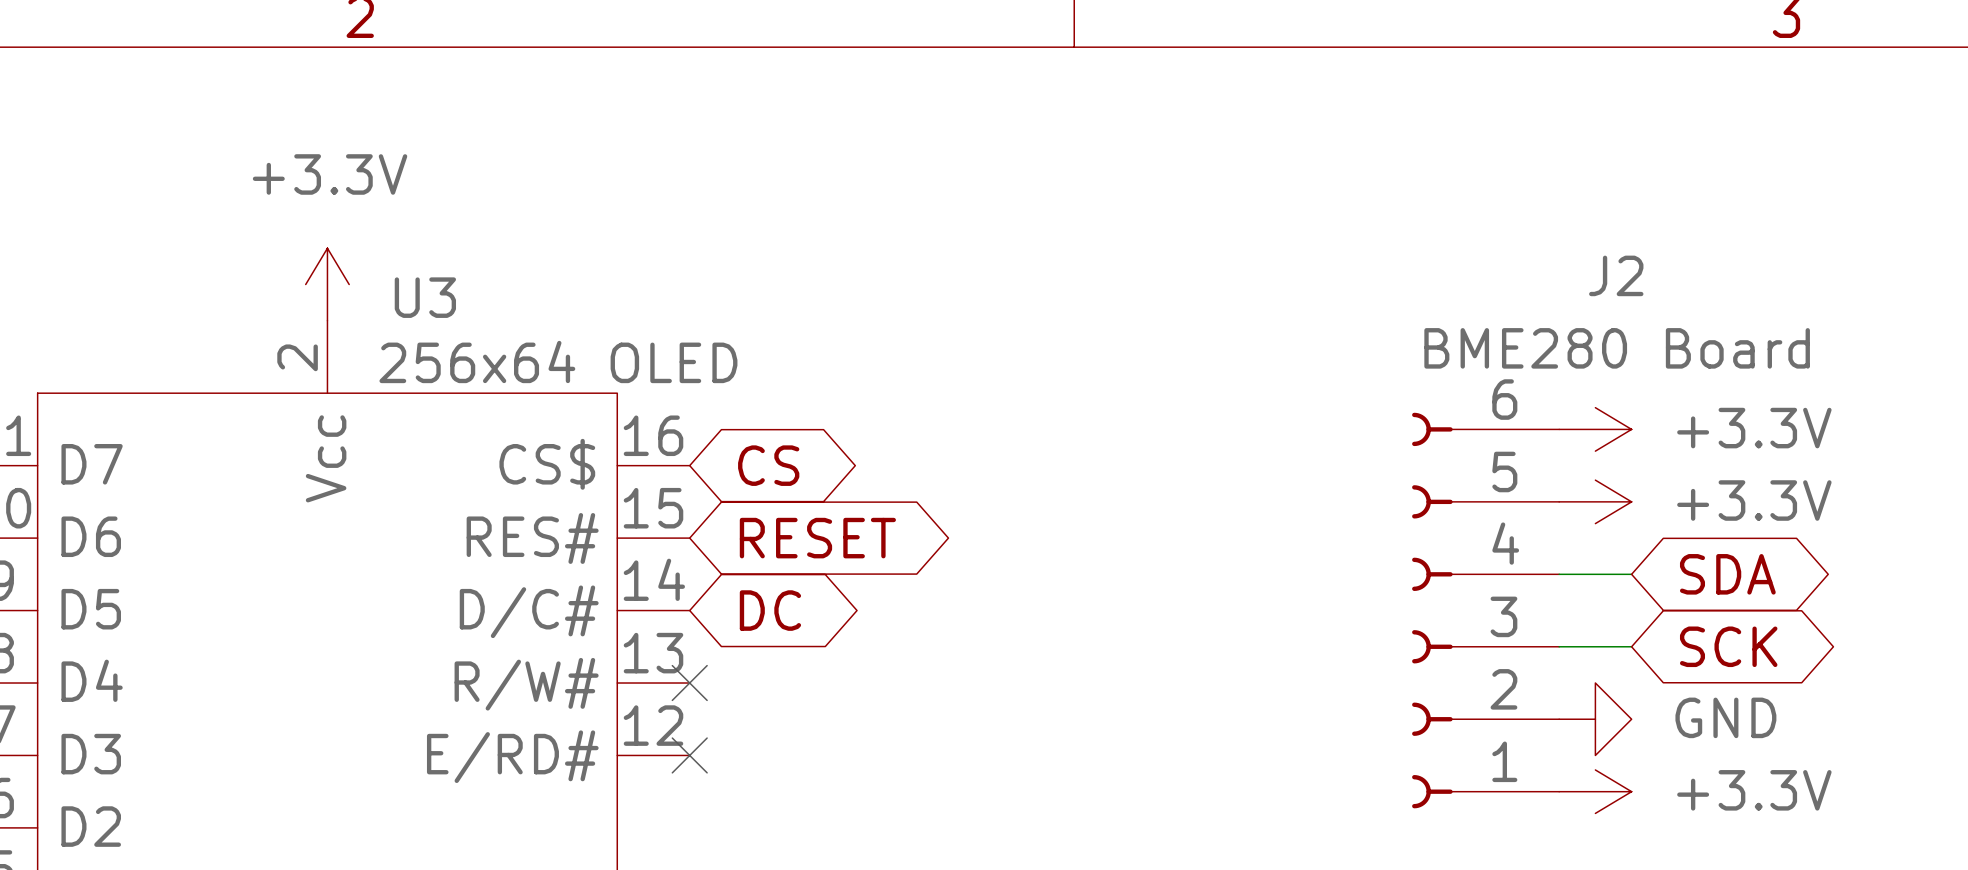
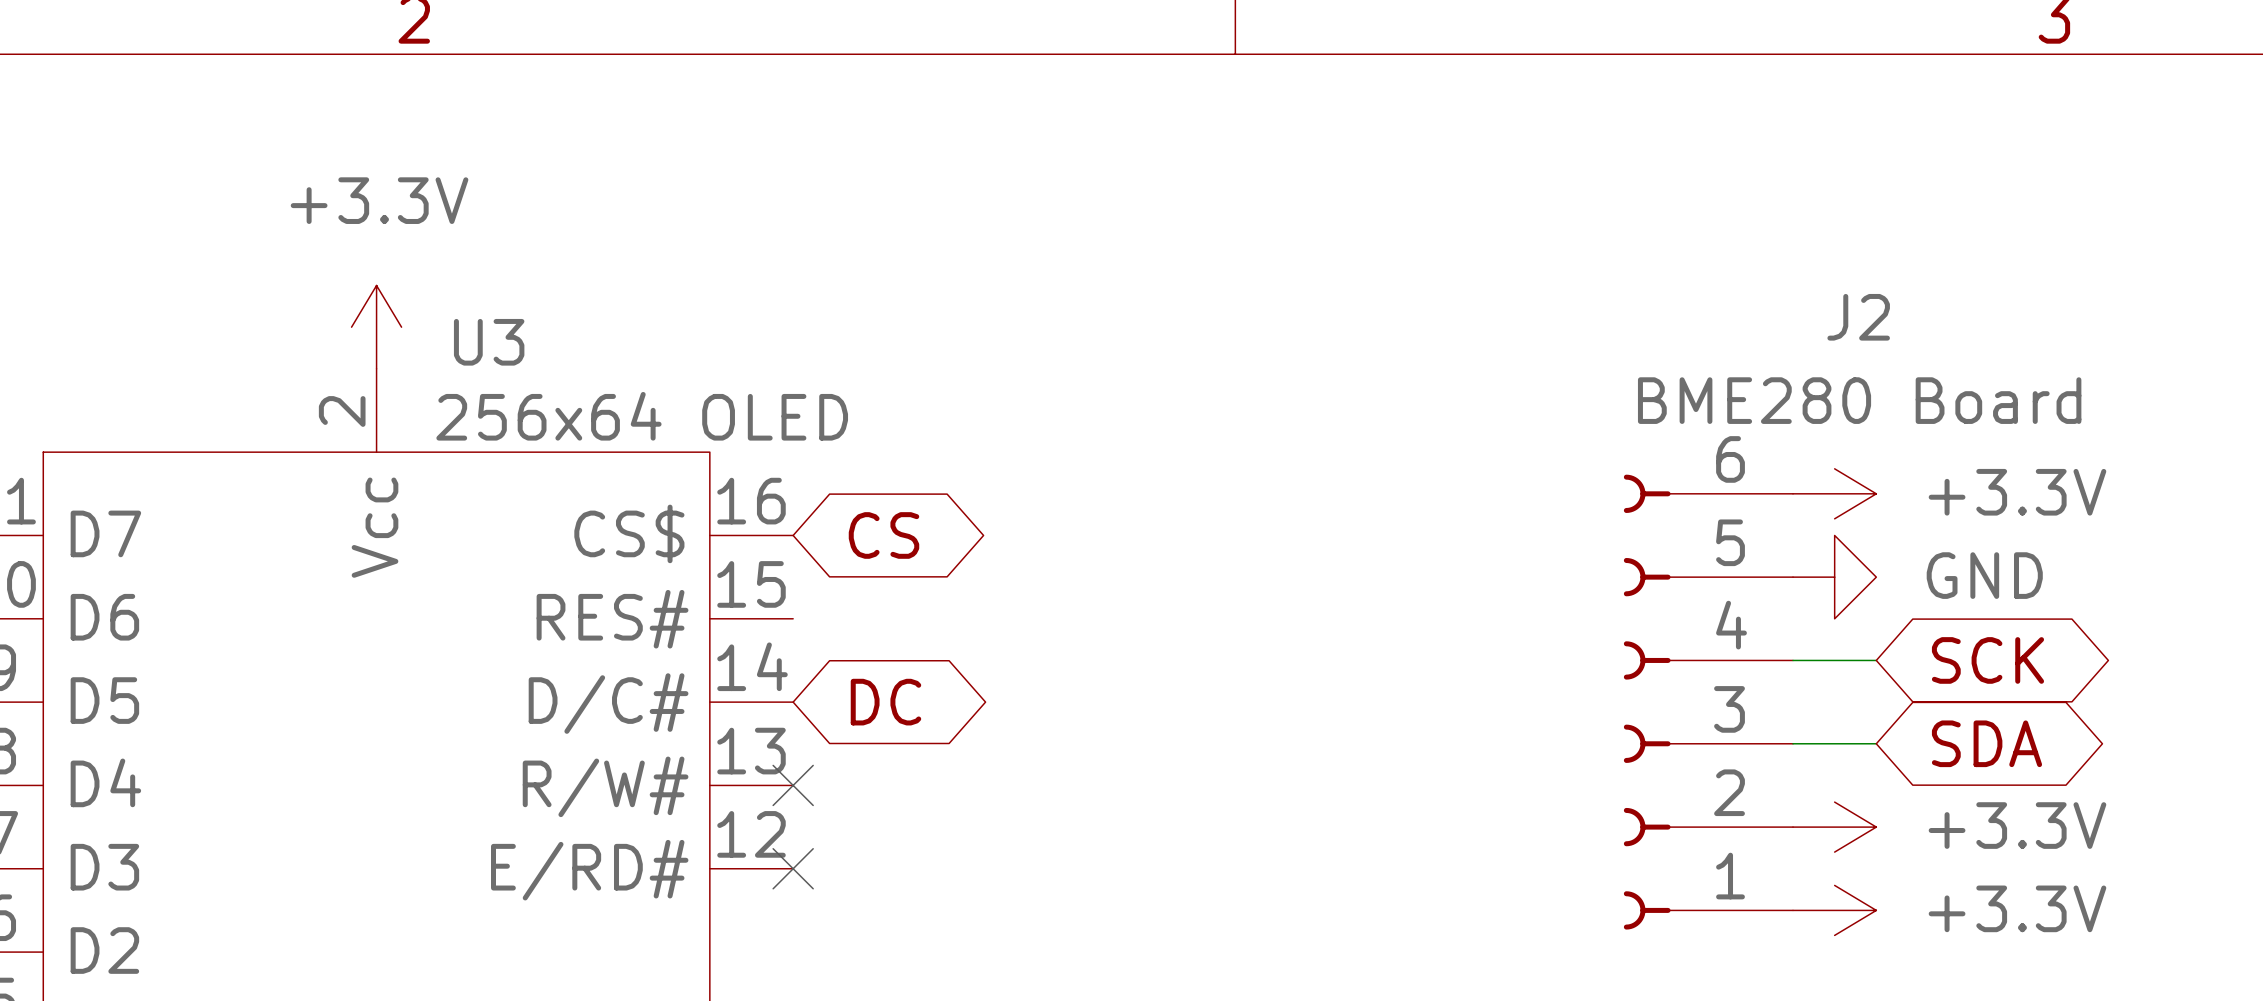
power symbol: +3.3V (1595, 501) -> GND (1834, 577)
global label: RESET (817, 538) -> none
global label: SDA (1727, 574) -> SCK (1987, 660)
global label: SCK (1728, 646) -> SDA (1986, 743)
power symbol: GND (1595, 719) -> +3.3V (1834, 827)

